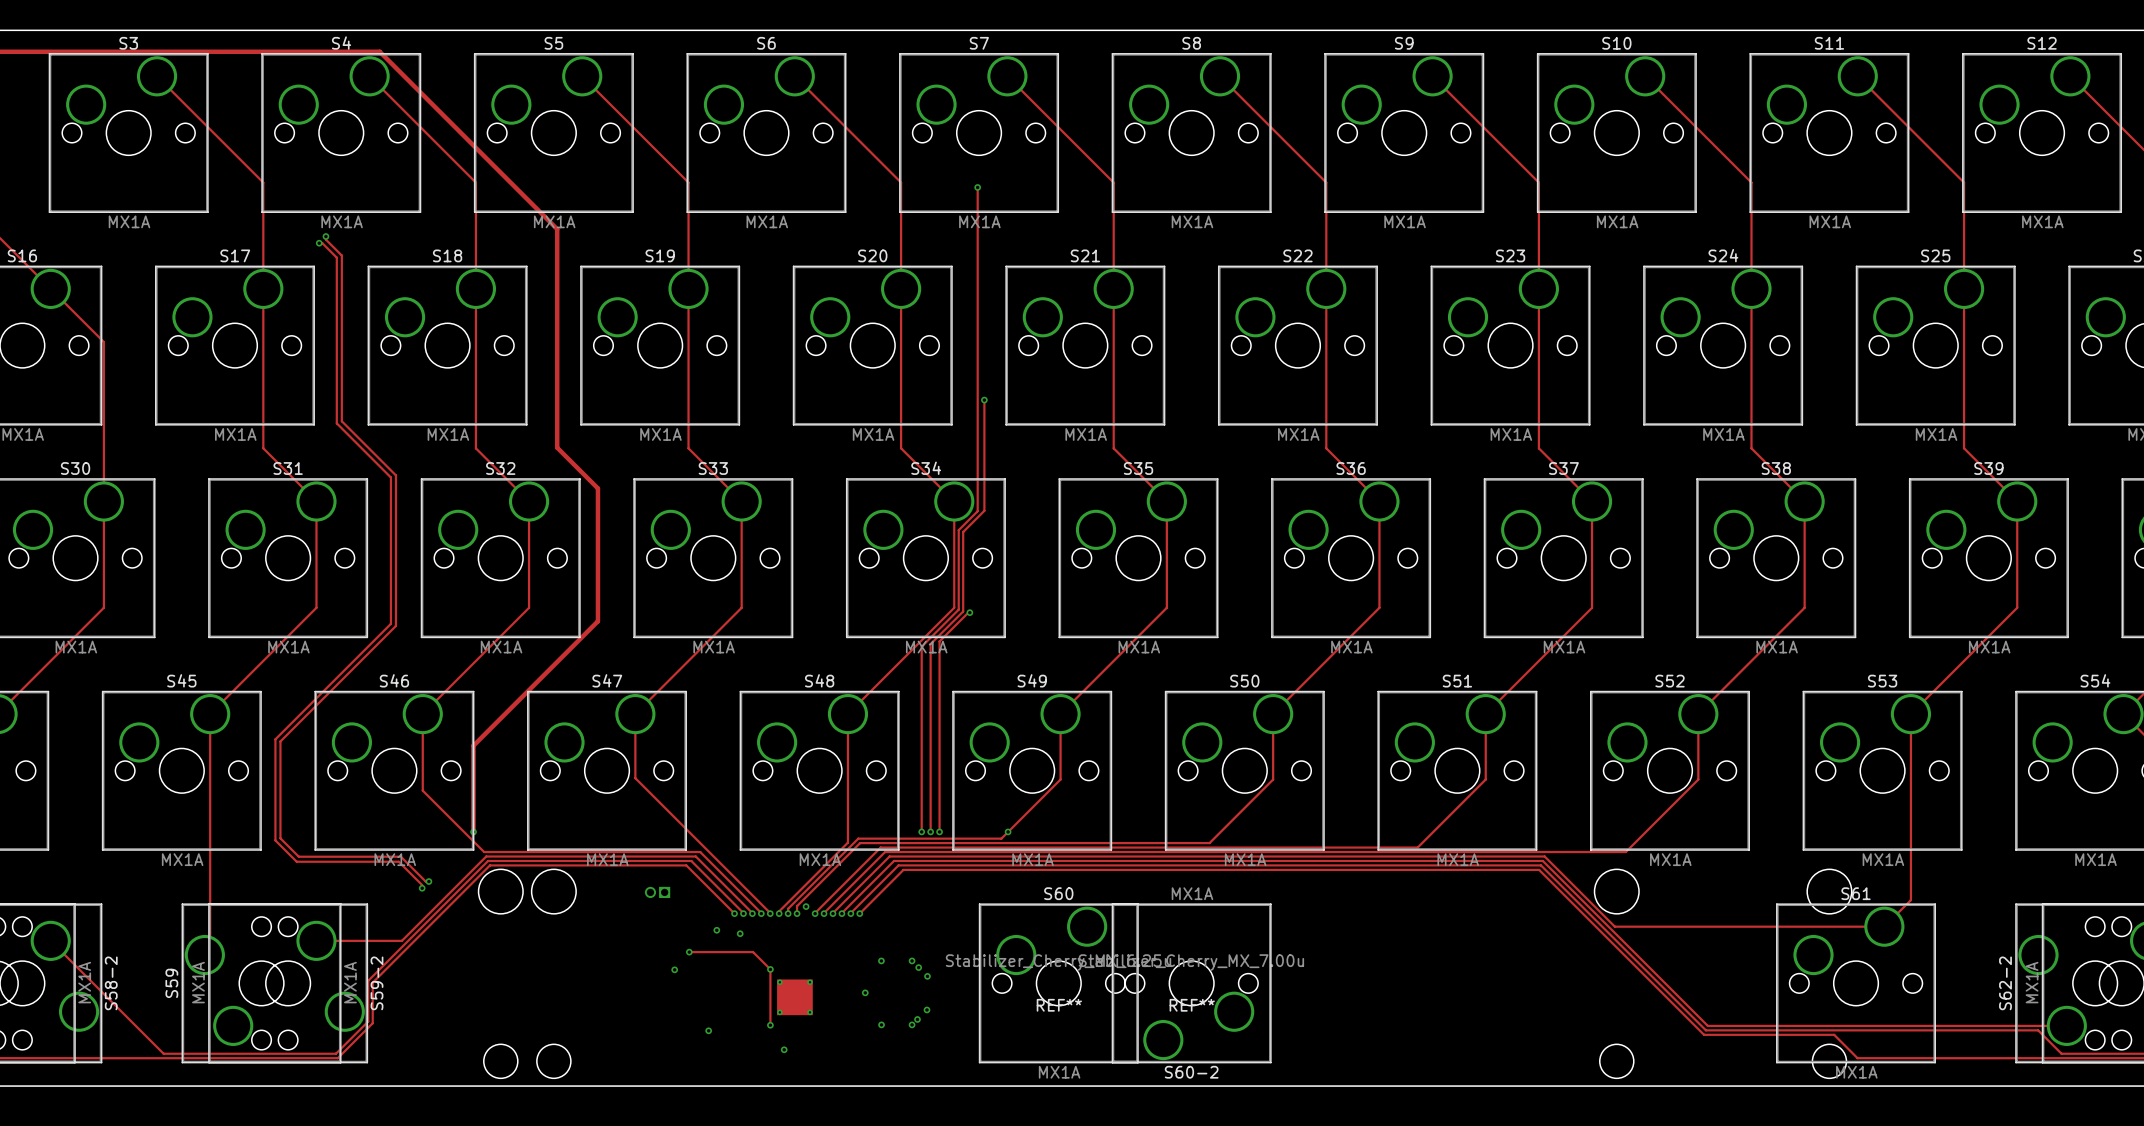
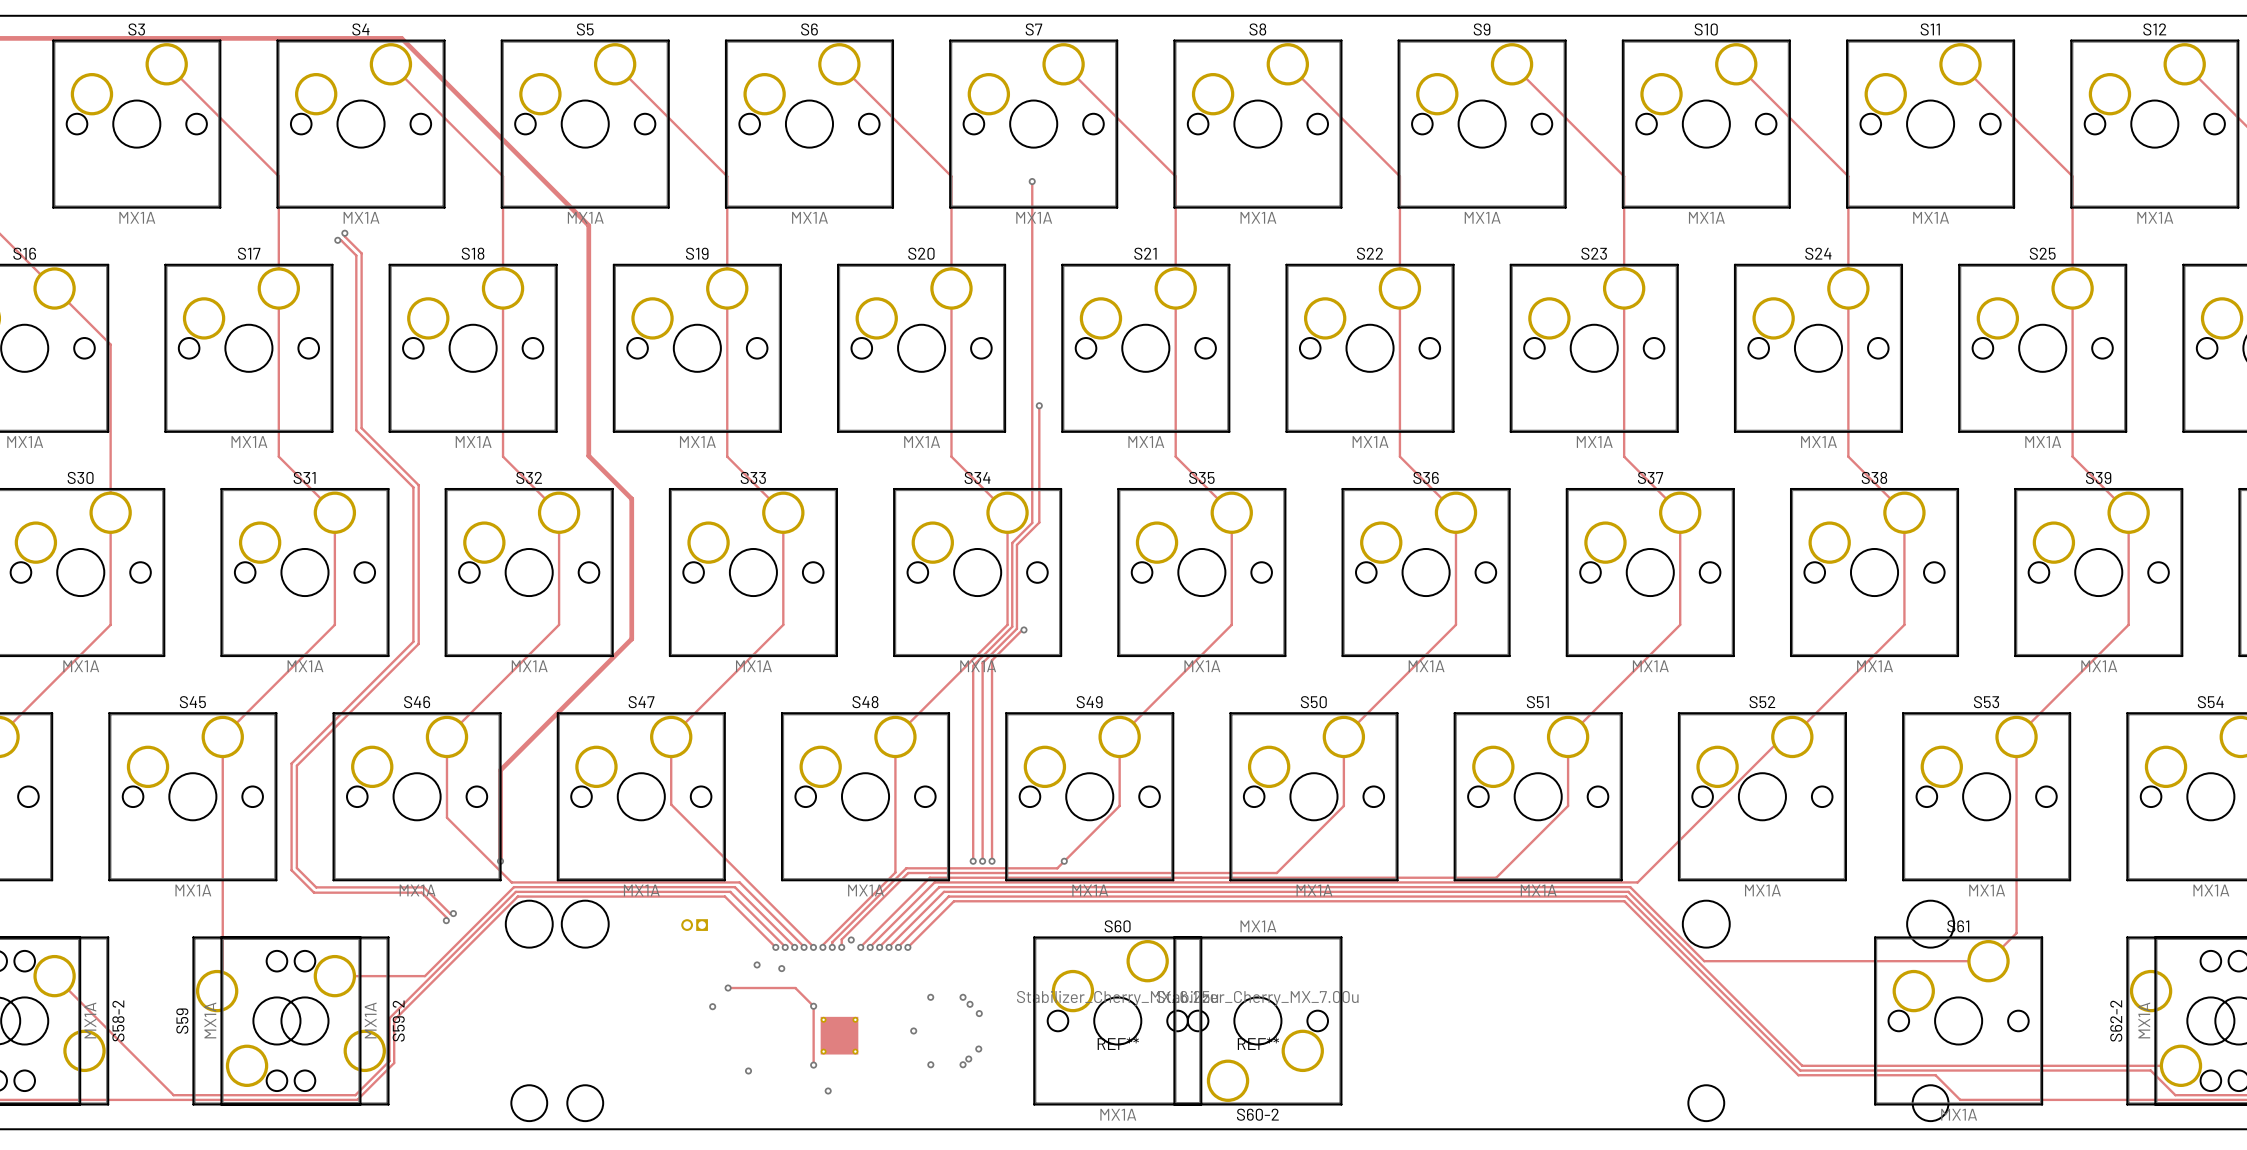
track: (1698, 714) (1698, 779) (1625, 852) (1551, 852) -> (1792, 736) (1783, 736) (1637, 882)

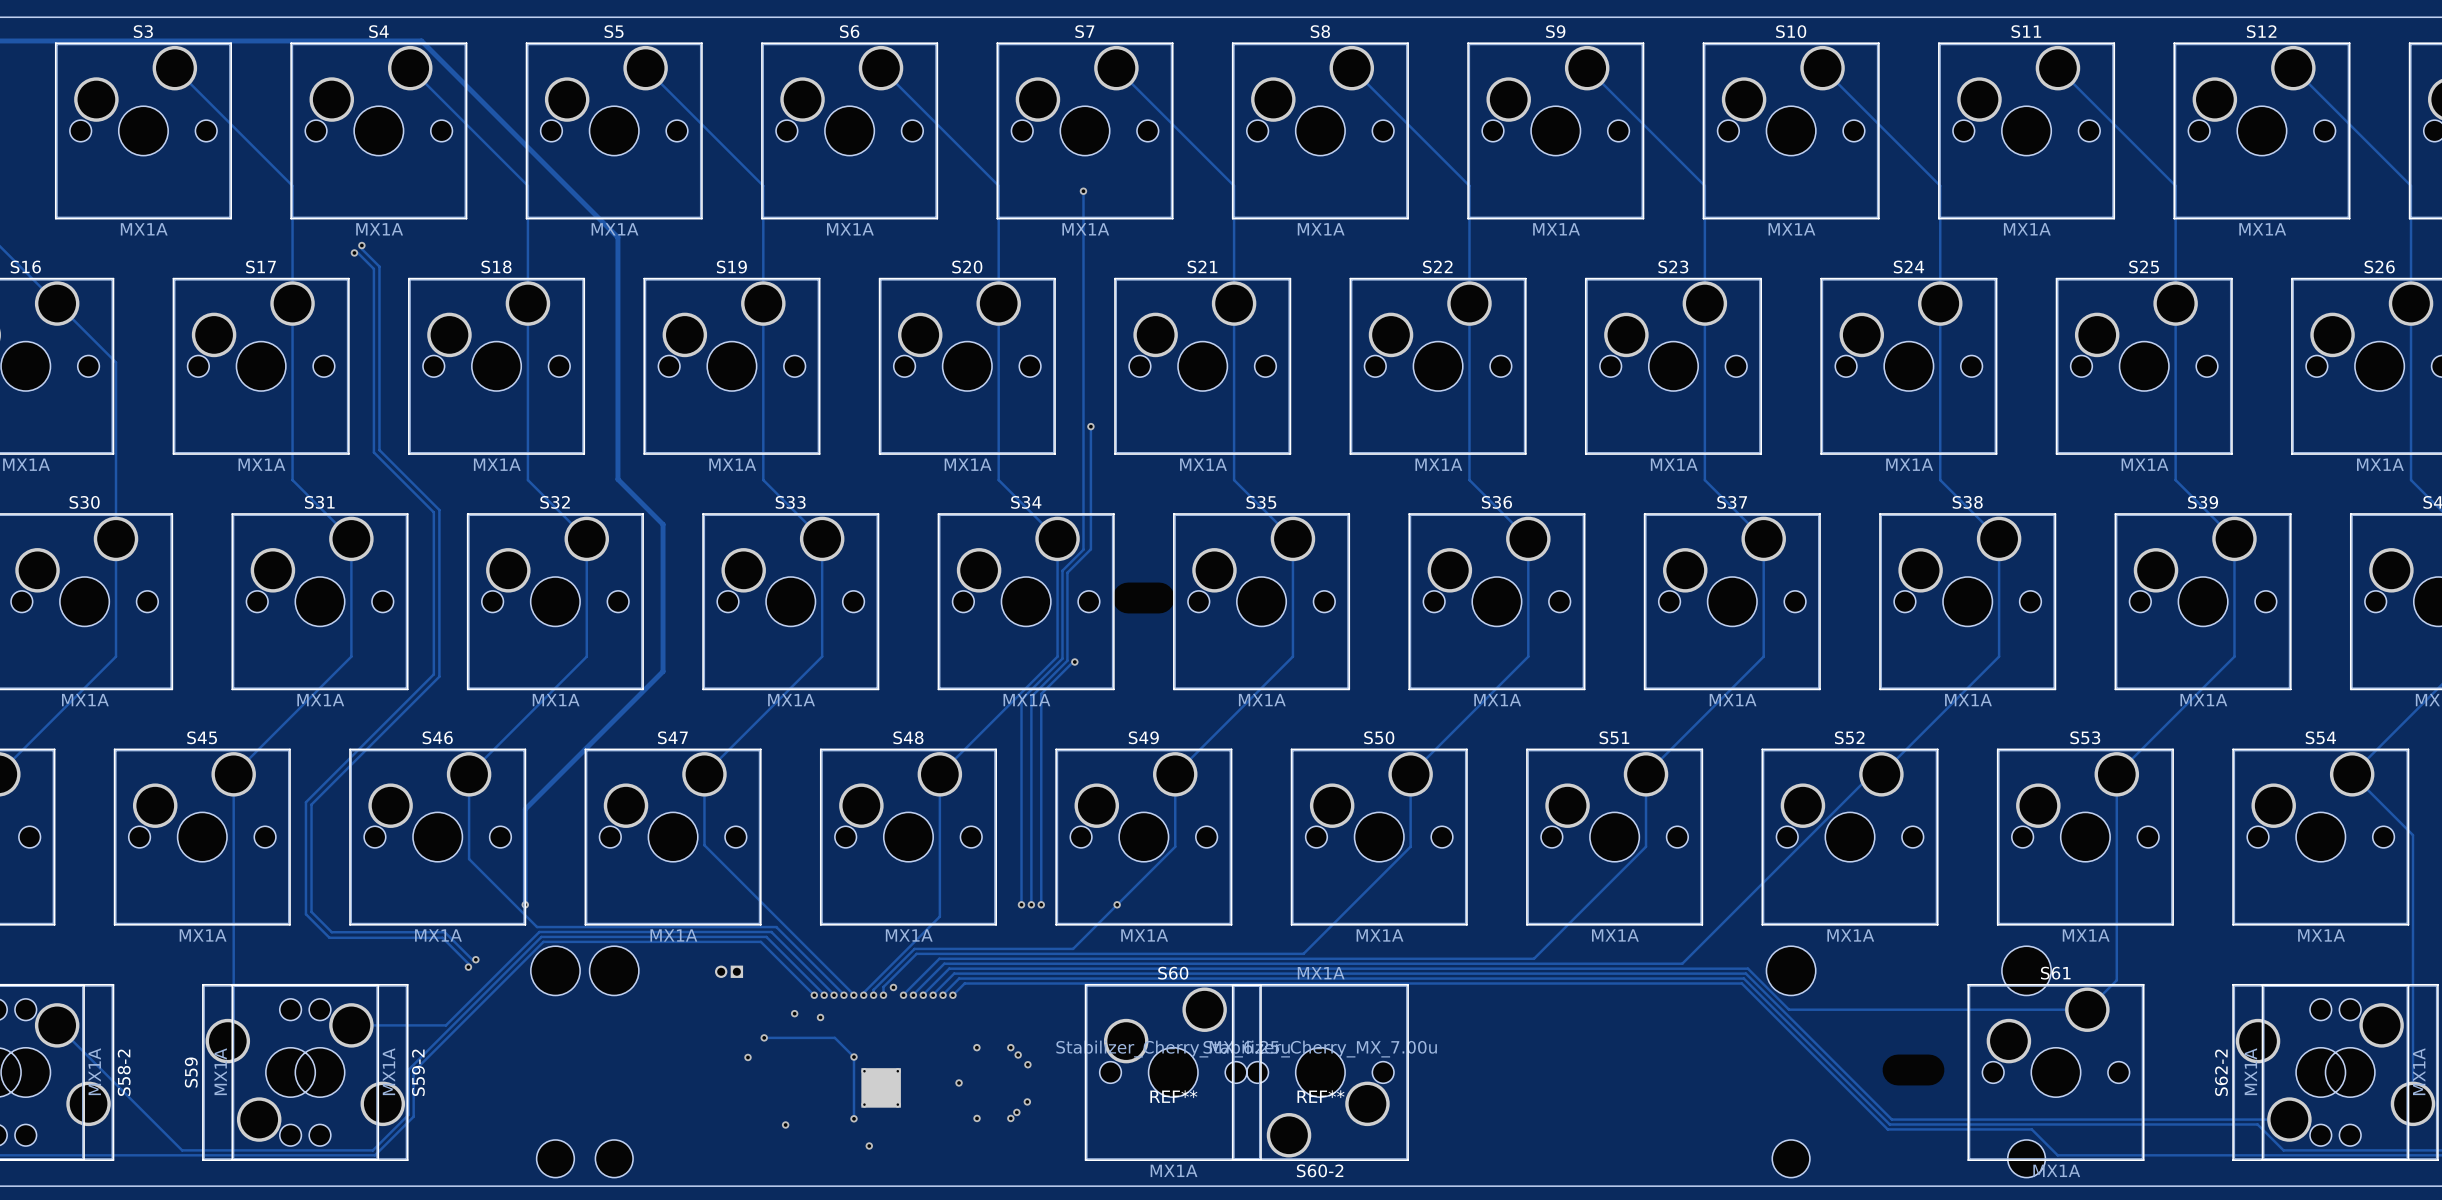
track: (1057, 868) (906, 868) (871, 903) -> (1109, 912) (1073, 948) (914, 948)
track: (1276, 873) (908, 873) (873, 907) -> (1340, 917) (1303, 953) (916, 953)
track: (1496, 877) (929, 877) (894, 912) -> (1570, 922) (1533, 958) (939, 958)
track: (1637, 882) (934, 882) (899, 917) -> (1719, 927) (1682, 963) (944, 963)
track: (904, 922) (939, 887) (1630, 887) (1665, 922) -> (949, 968) (1747, 968)
track: (909, 926) (944, 891) (1628, 891) (1663, 926) -> (954, 973) (1745, 973)
track: (913, 931) (948, 896) (1626, 896) (1661, 931) -> (959, 978) (1743, 978)
track: (919, 936) (954, 901) (1624, 901) (1659, 936) -> (964, 983) (1741, 983)

